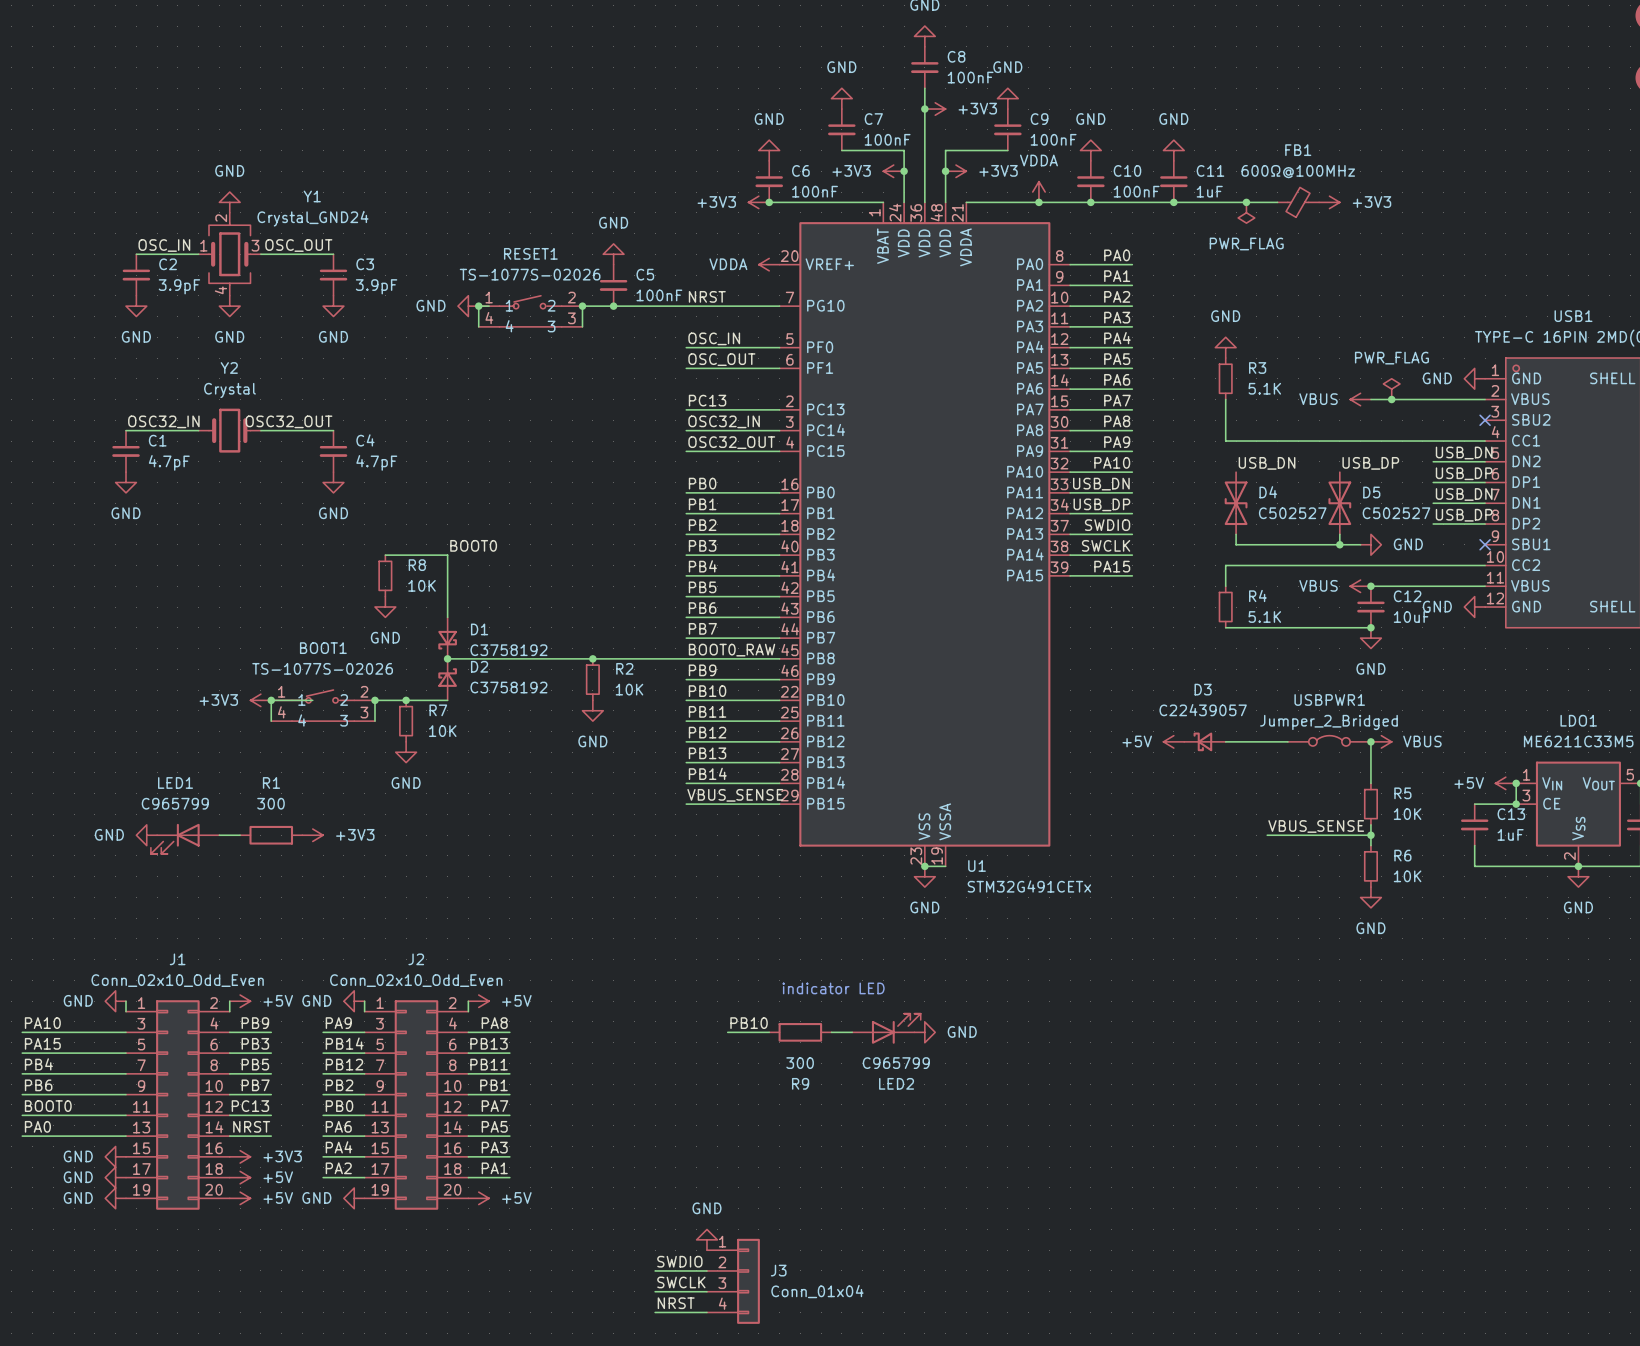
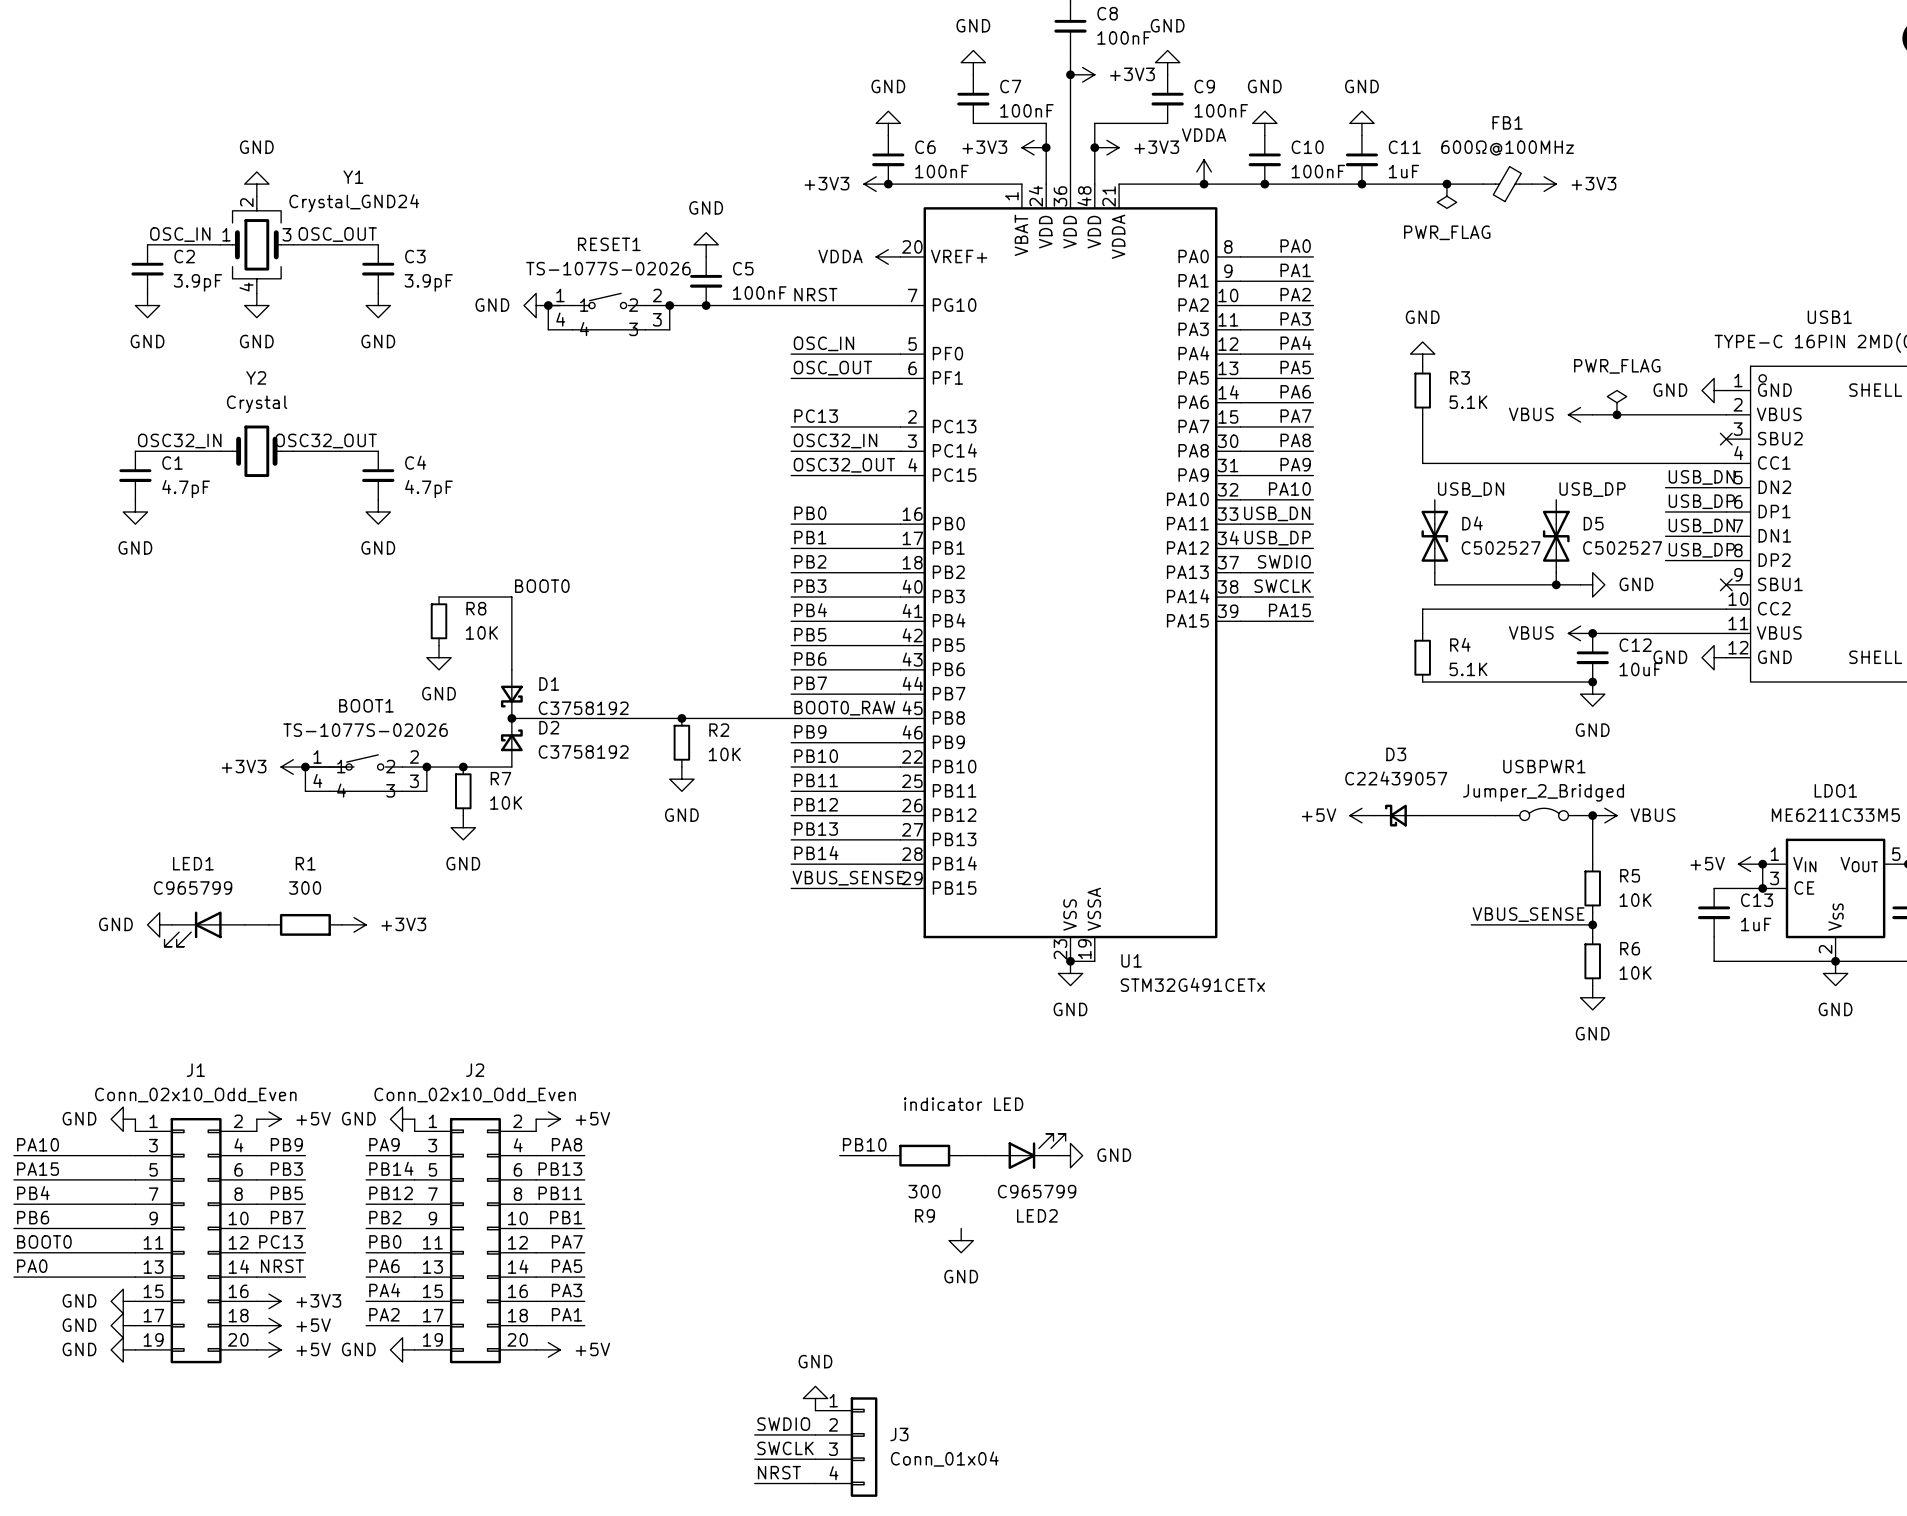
power symbol: none -> GND (961, 1240)

